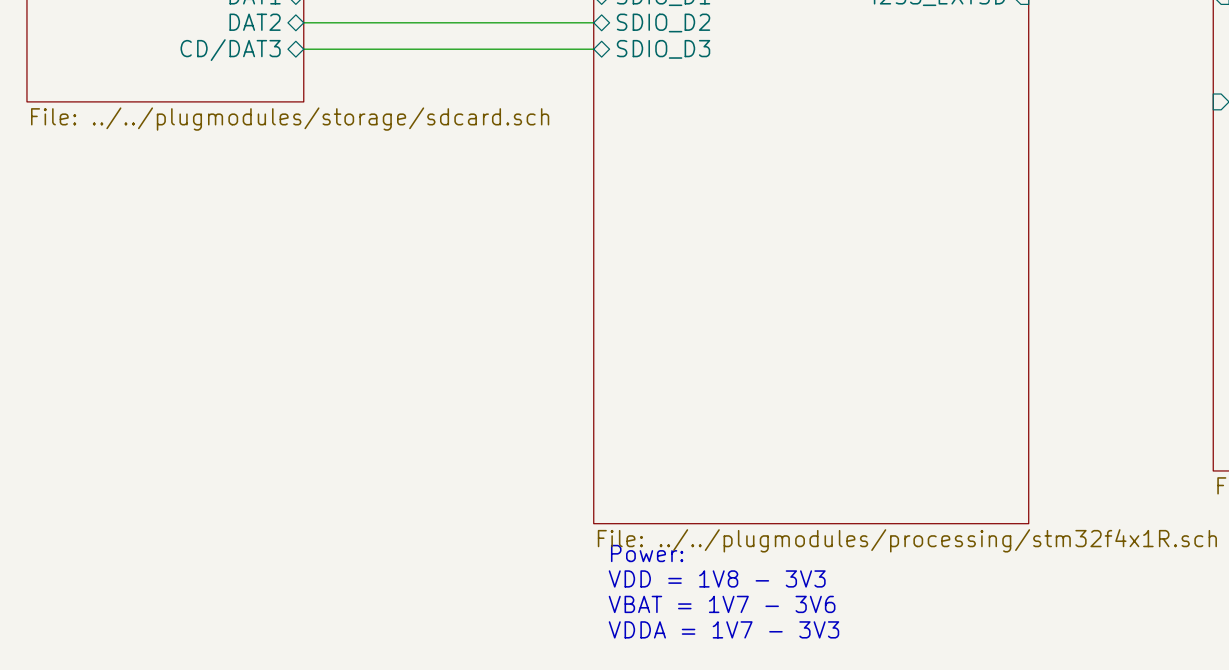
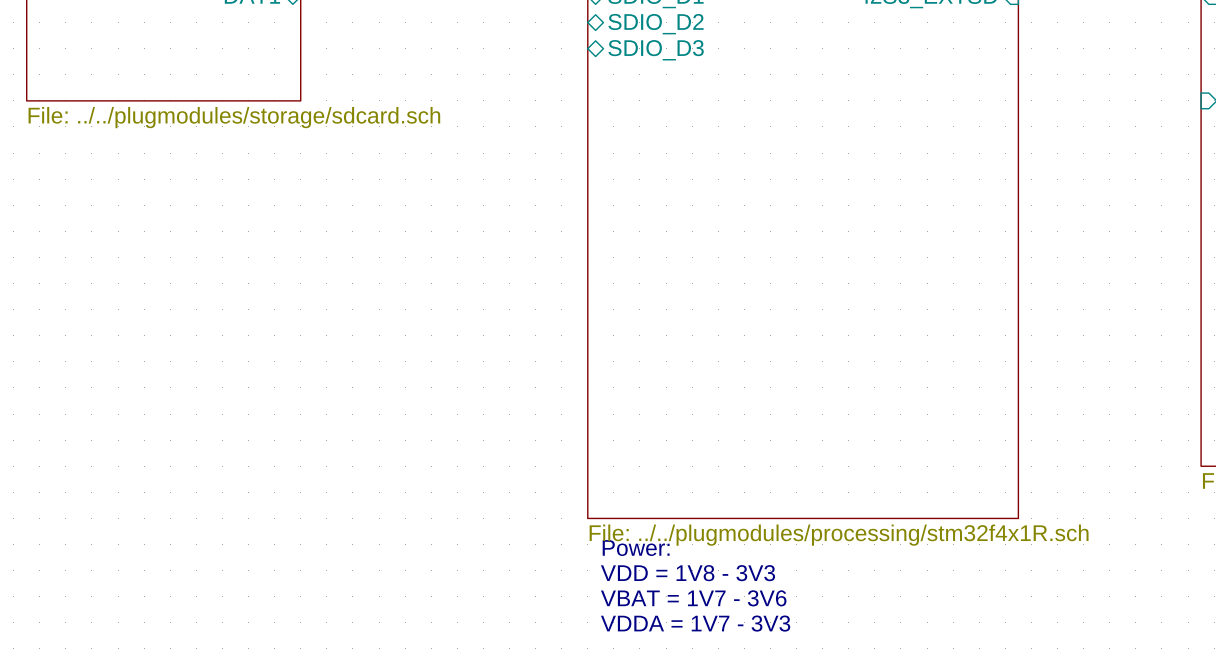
sheet pin: DAT2 (255, 22) -> none
wire: (303, 22) (593, 22) -> none
wire: (303, 49) (593, 49) -> none
sheet pin: CD/DAT3 (230, 50) -> none

